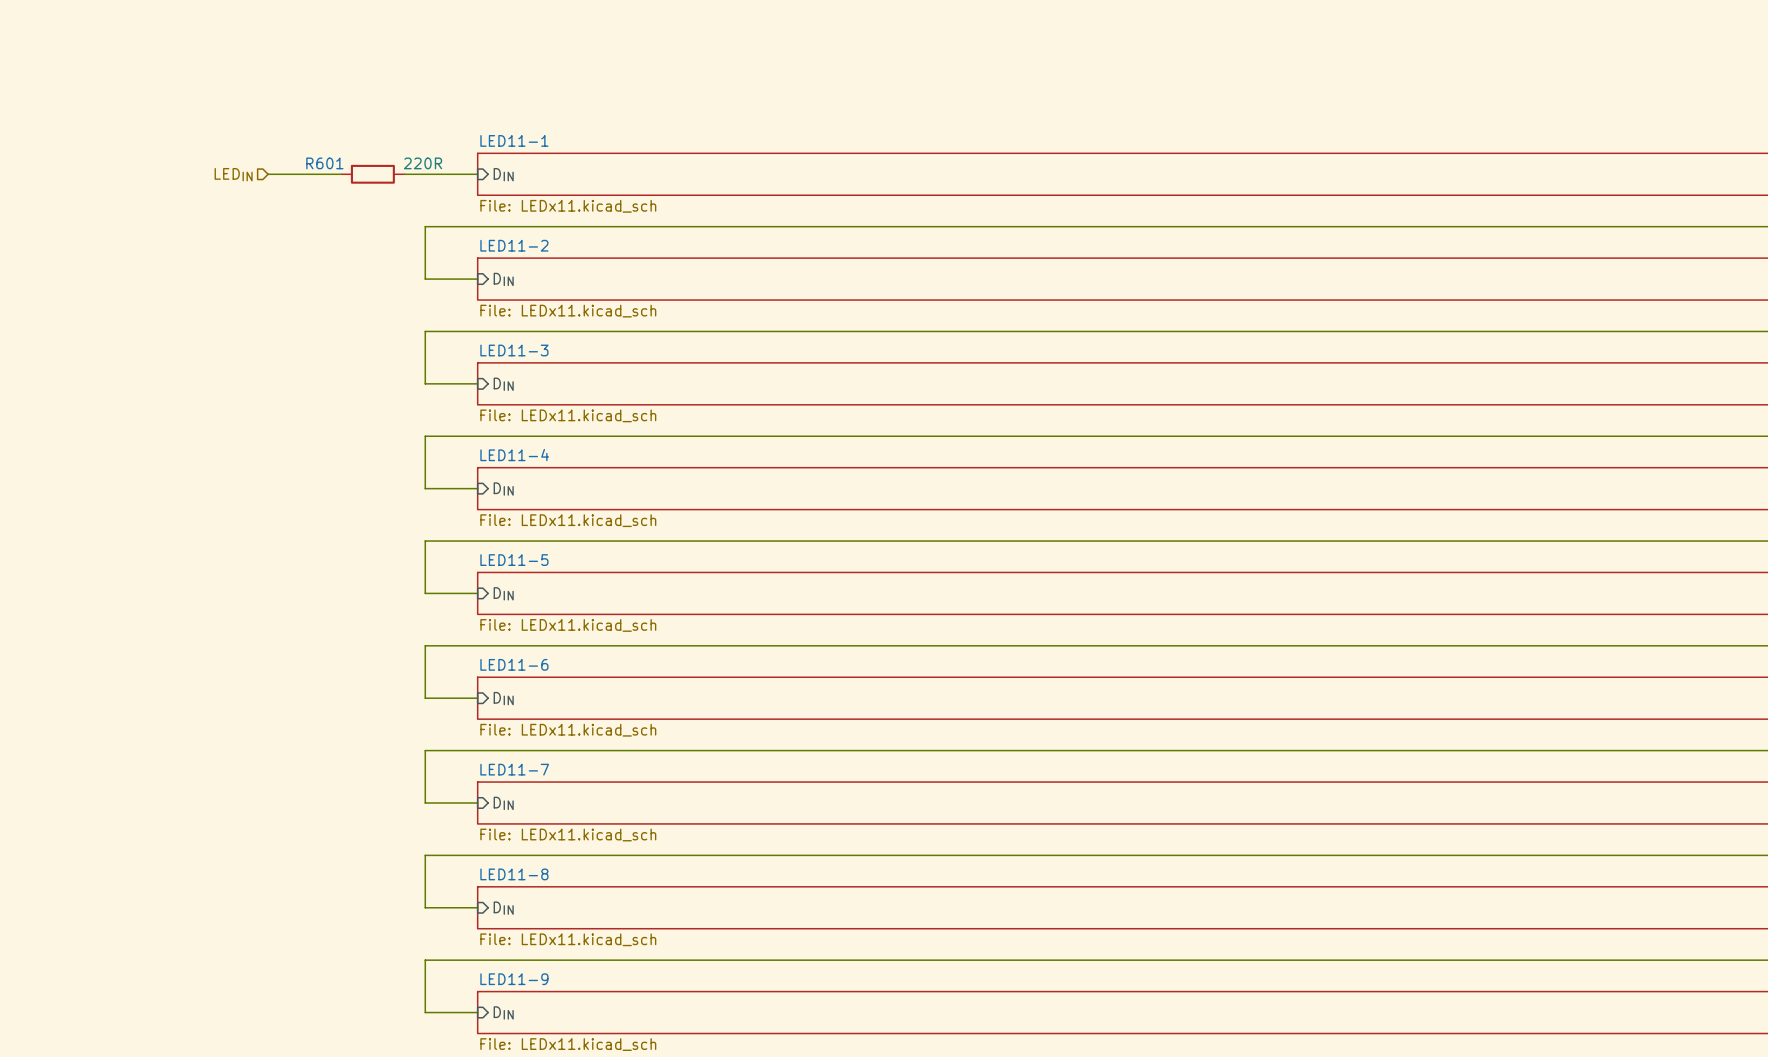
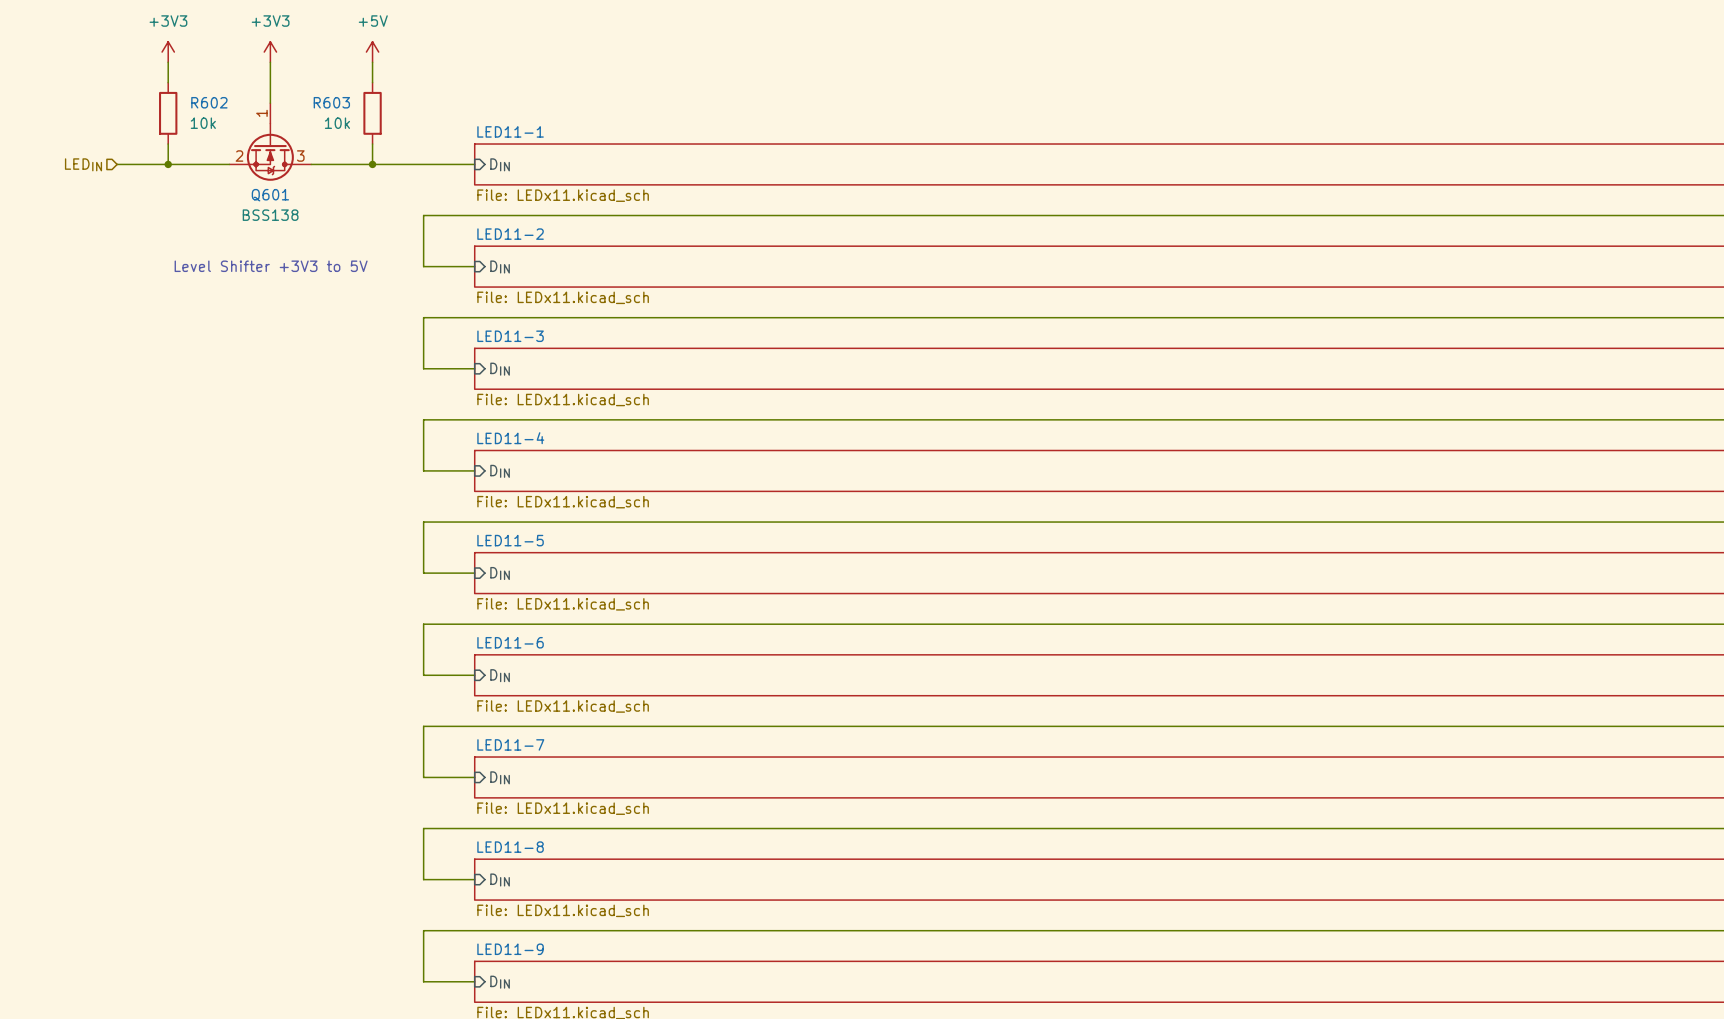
power symbol: none -> +3V3 (168, 52)
power symbol: none -> +3V3 (270, 52)
power symbol: none -> +5V (372, 52)
wire: none -> (168, 62) (168, 82)
wire: none -> (270, 62) (270, 103)
wire: none -> (372, 62) (372, 82)
R602: none -> 10k (168, 113)
R603: none -> 10k (372, 113)
Q601: none -> BSS138 (270, 141)
wire: none -> (168, 144) (168, 164)
wire: none -> (372, 144) (372, 164)
wire: none -> (117, 164) (229, 164)
junction: none -> (168, 164)
hierarchical label position: LEDIN (233, 174) -> LEDIN (83, 164)
wire: none -> (341, 164) (403, 164)
R601: 220R (372, 174) -> none
junction: none -> (372, 164)
text: none -> Level Shifter +3V3 to 5V (271, 266)

